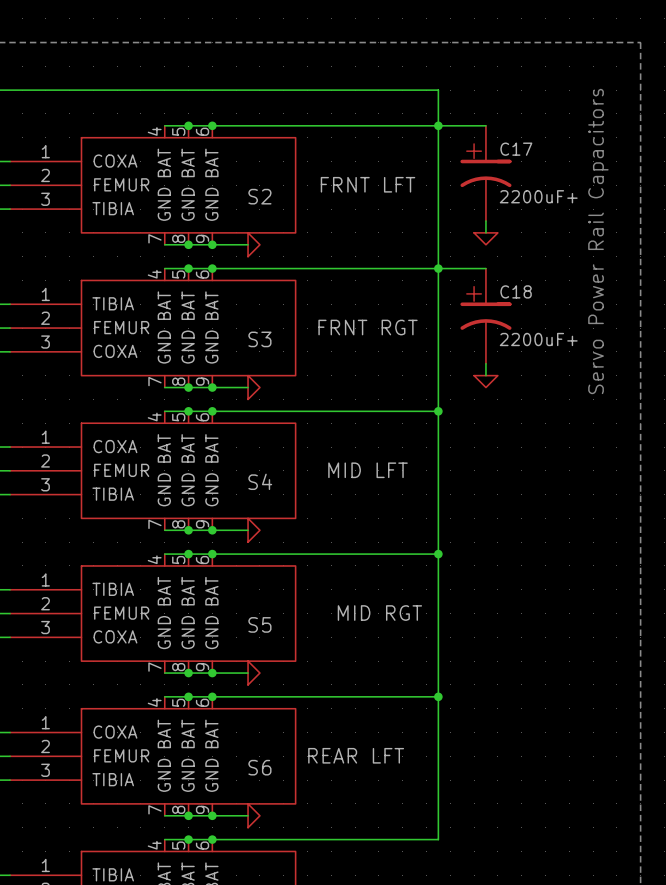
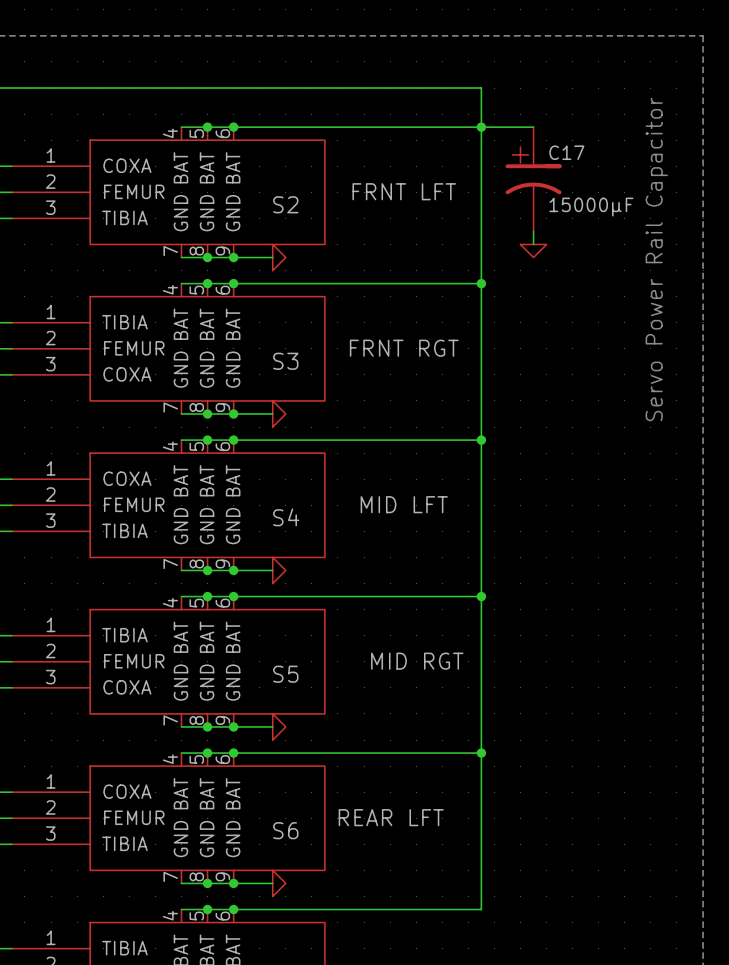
C17 value: 2200uF+ (538, 196) -> 15000µF (591, 207)
text: Servo Power Rail Capacitors (598, 241) -> Servo Power Rail Capacitor (656, 259)
wire: (438, 268) (485, 268) -> none
C18: 2200uF+ (485, 316) -> none
wire: (485, 363) (485, 375) -> none
power symbol: (485, 381) -> none

